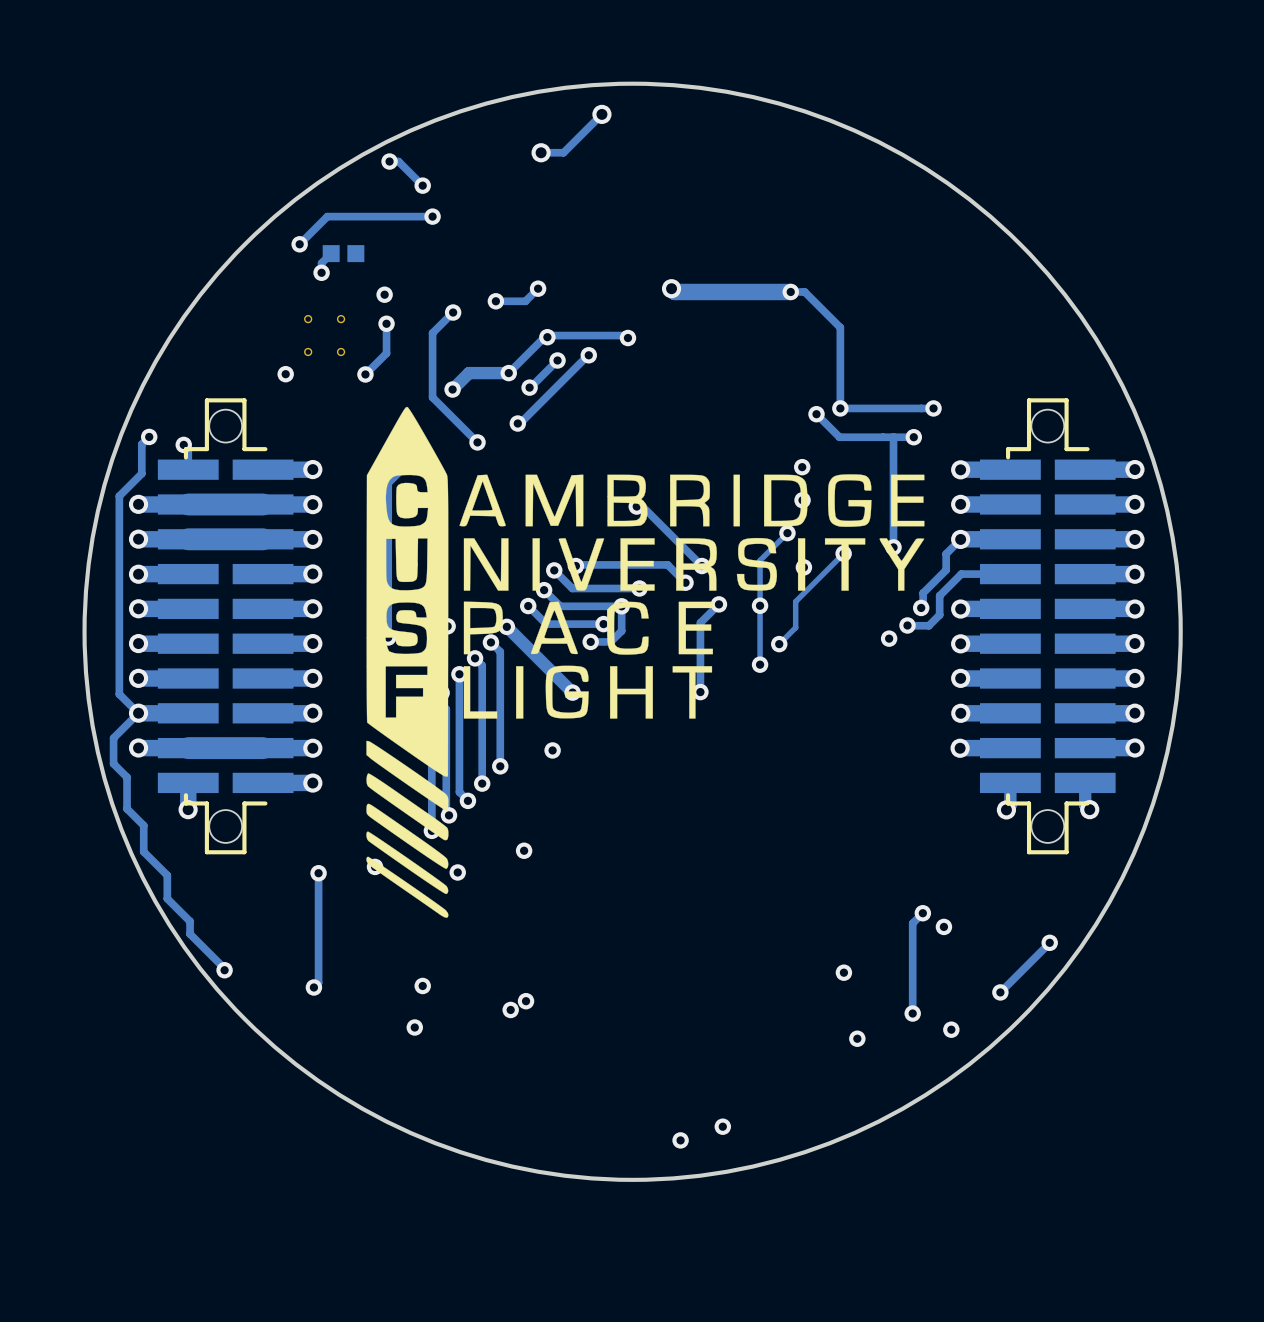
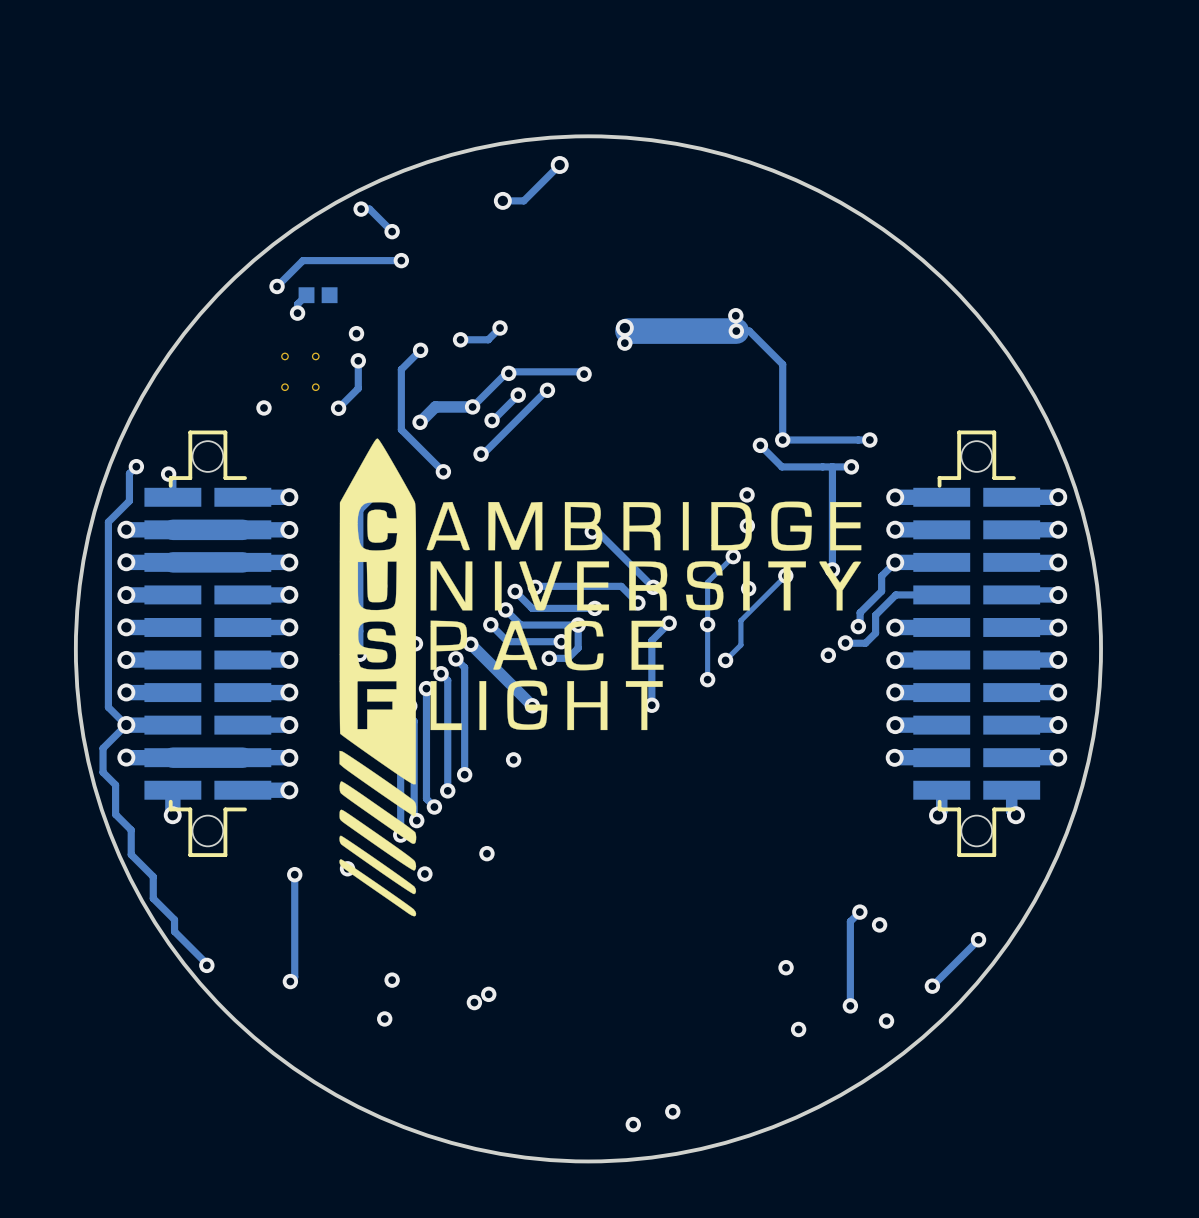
via: none -> (735, 315)
track width: thin (790, 291) (674, 291) -> thick (736, 331) (627, 331)
via: none -> (624, 343)

